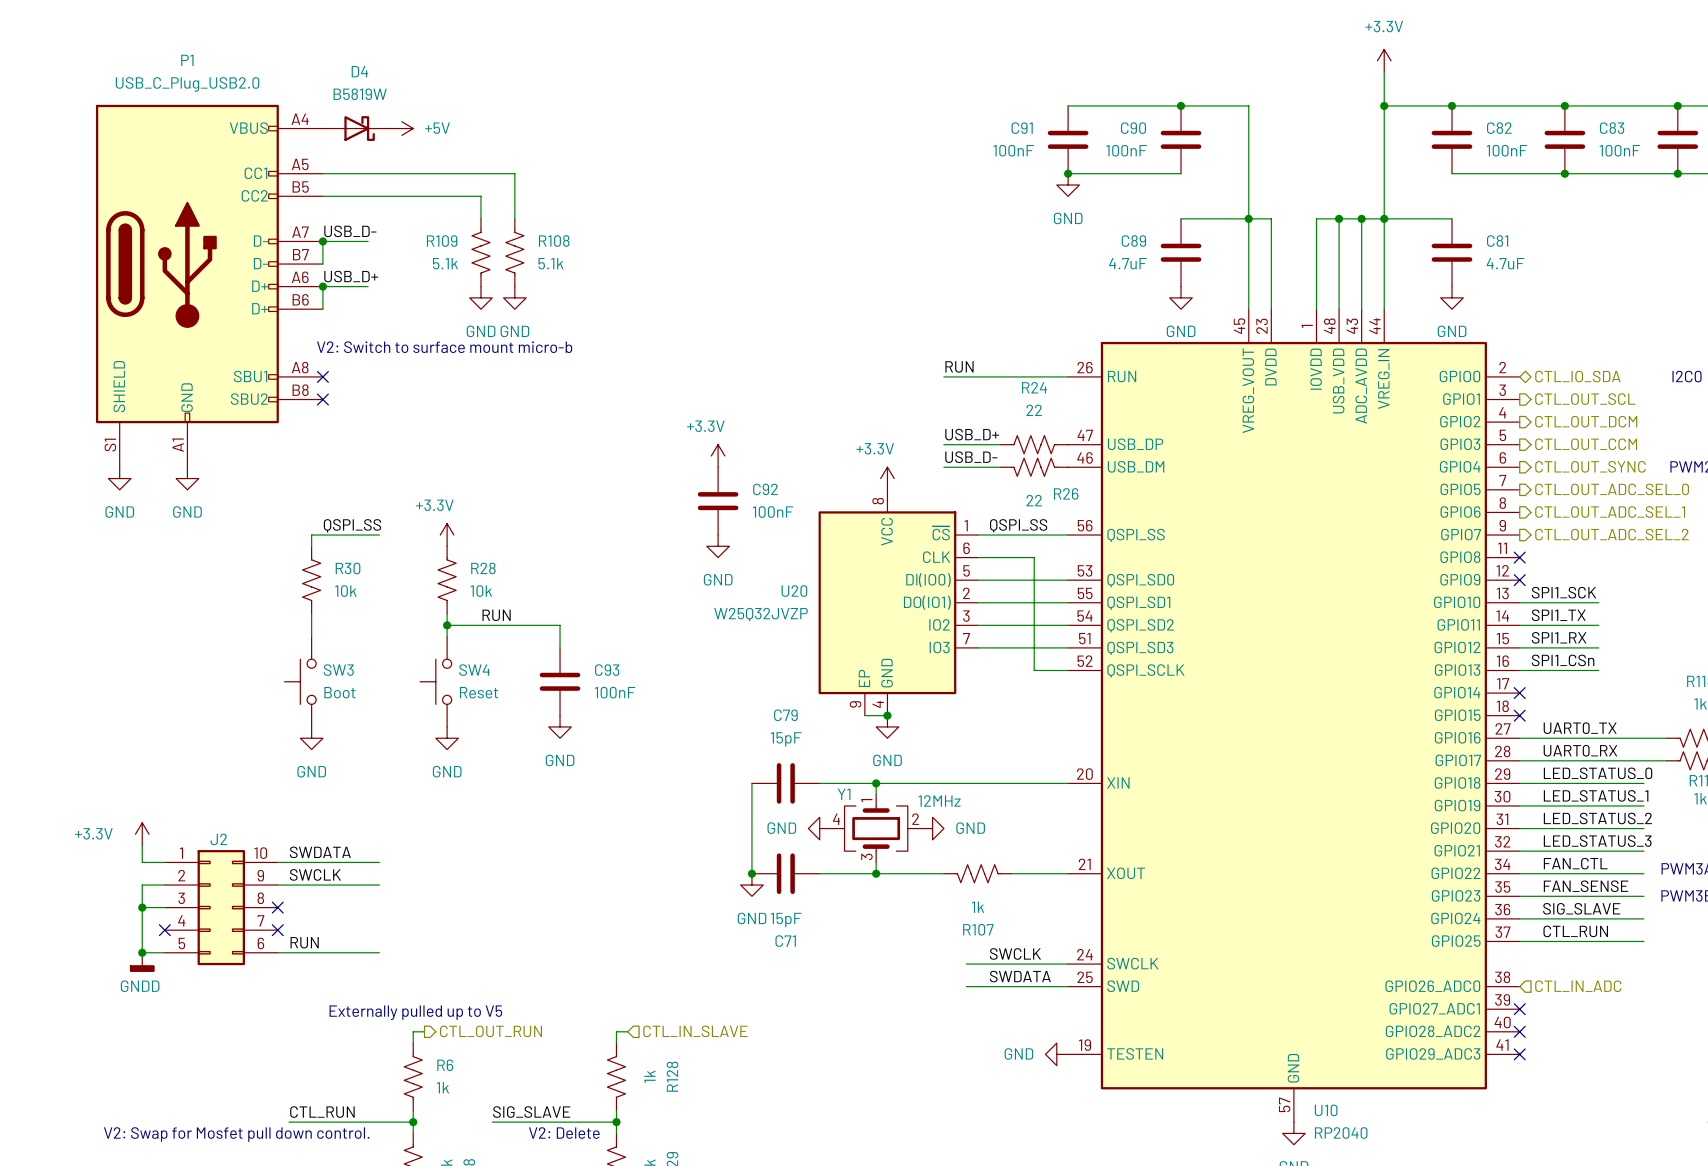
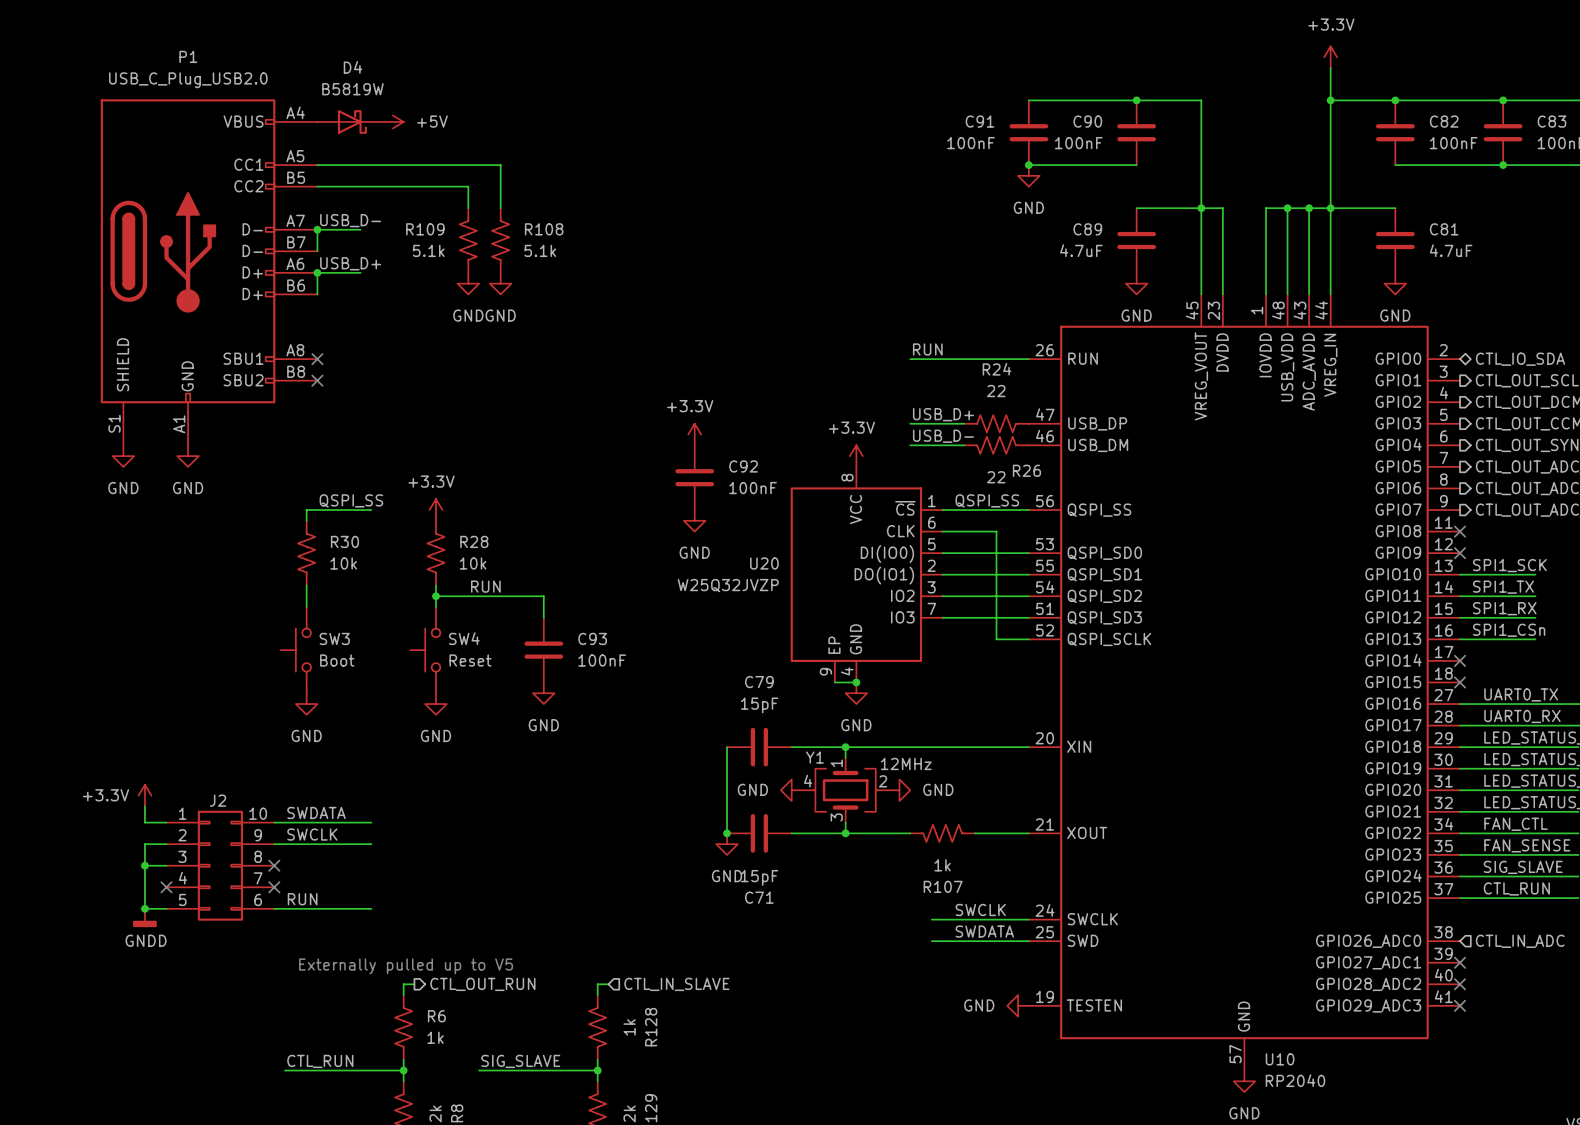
text: V2: Switch to surface mount micro-b (444, 347) -> none
text: V2: Delete (564, 1133) -> none
text: V2: Swap for Mosfet pull down control. (236, 1134) -> none

